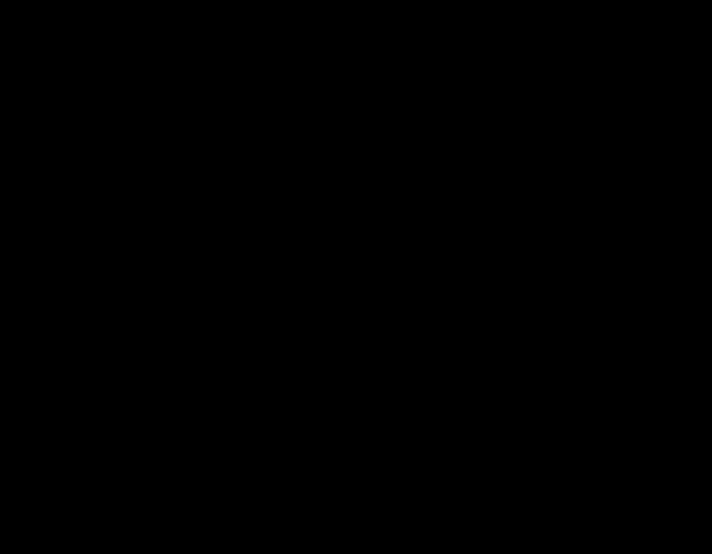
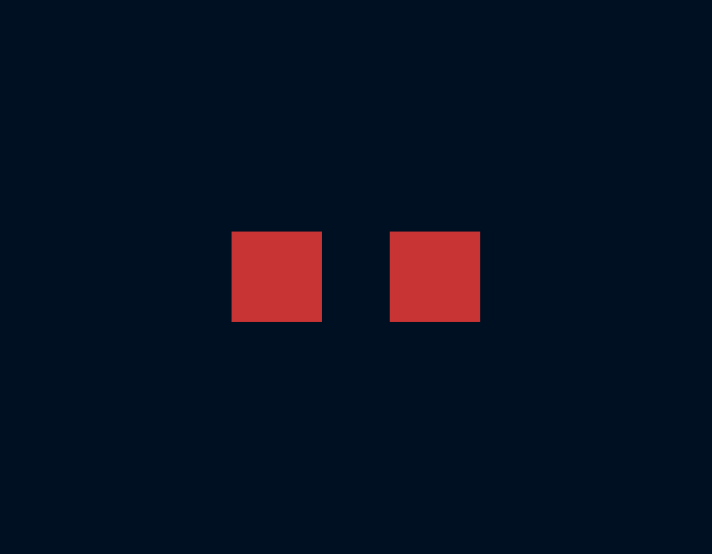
part: none -> (355, 276)

